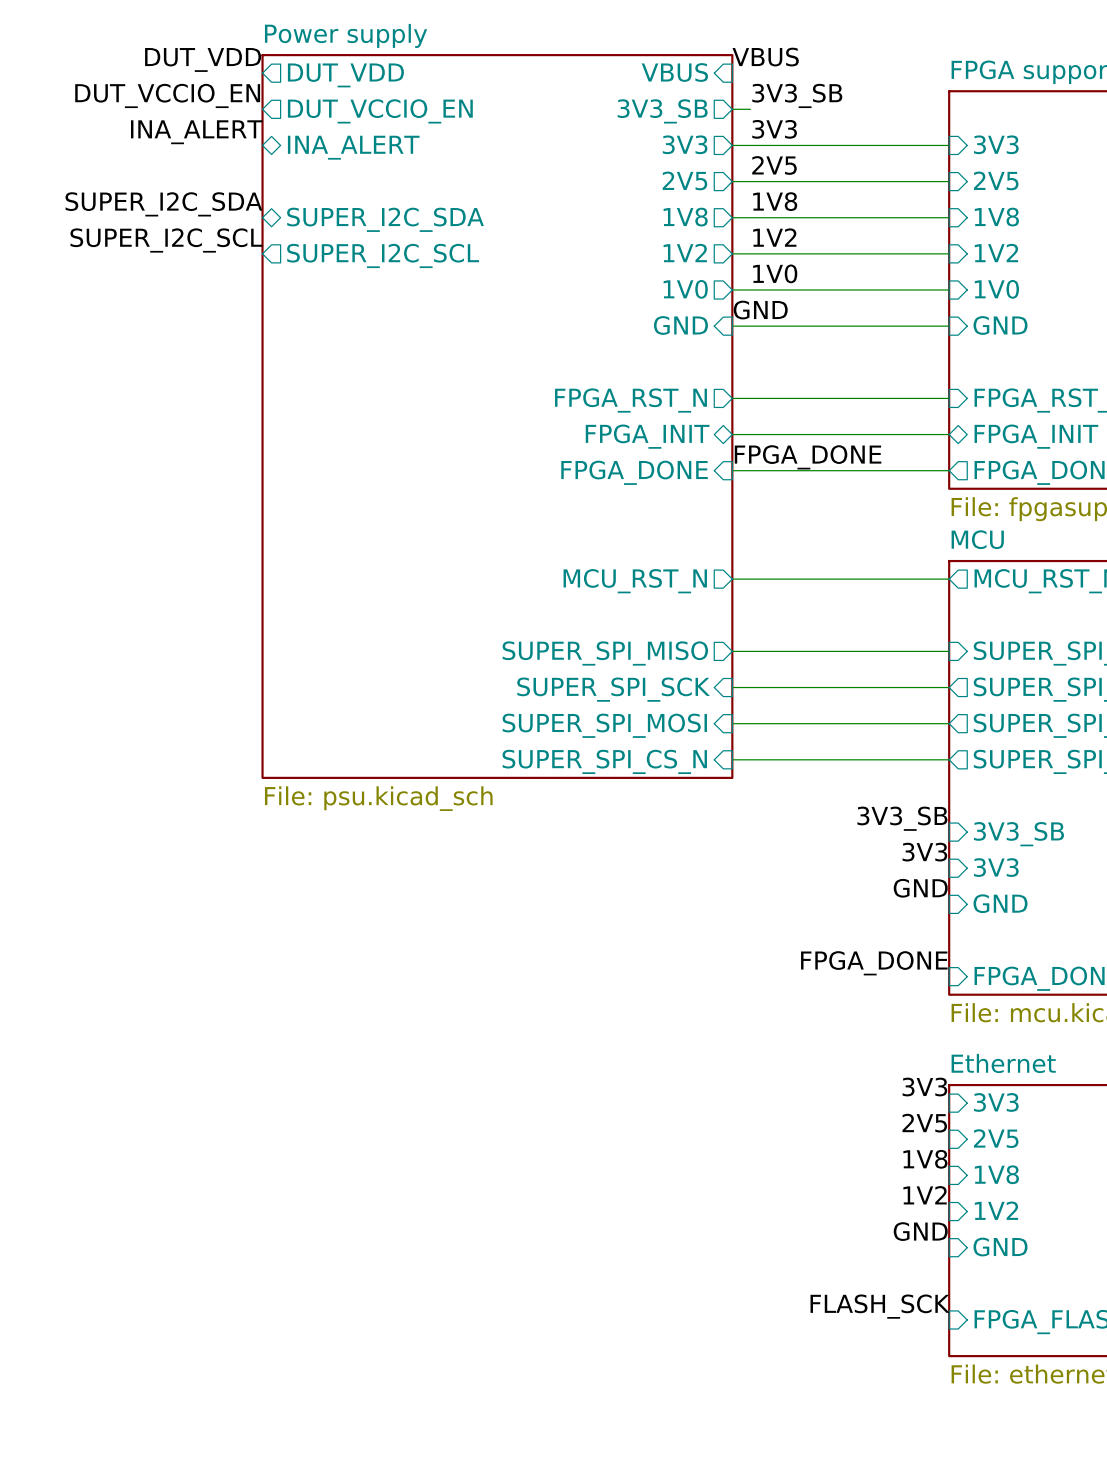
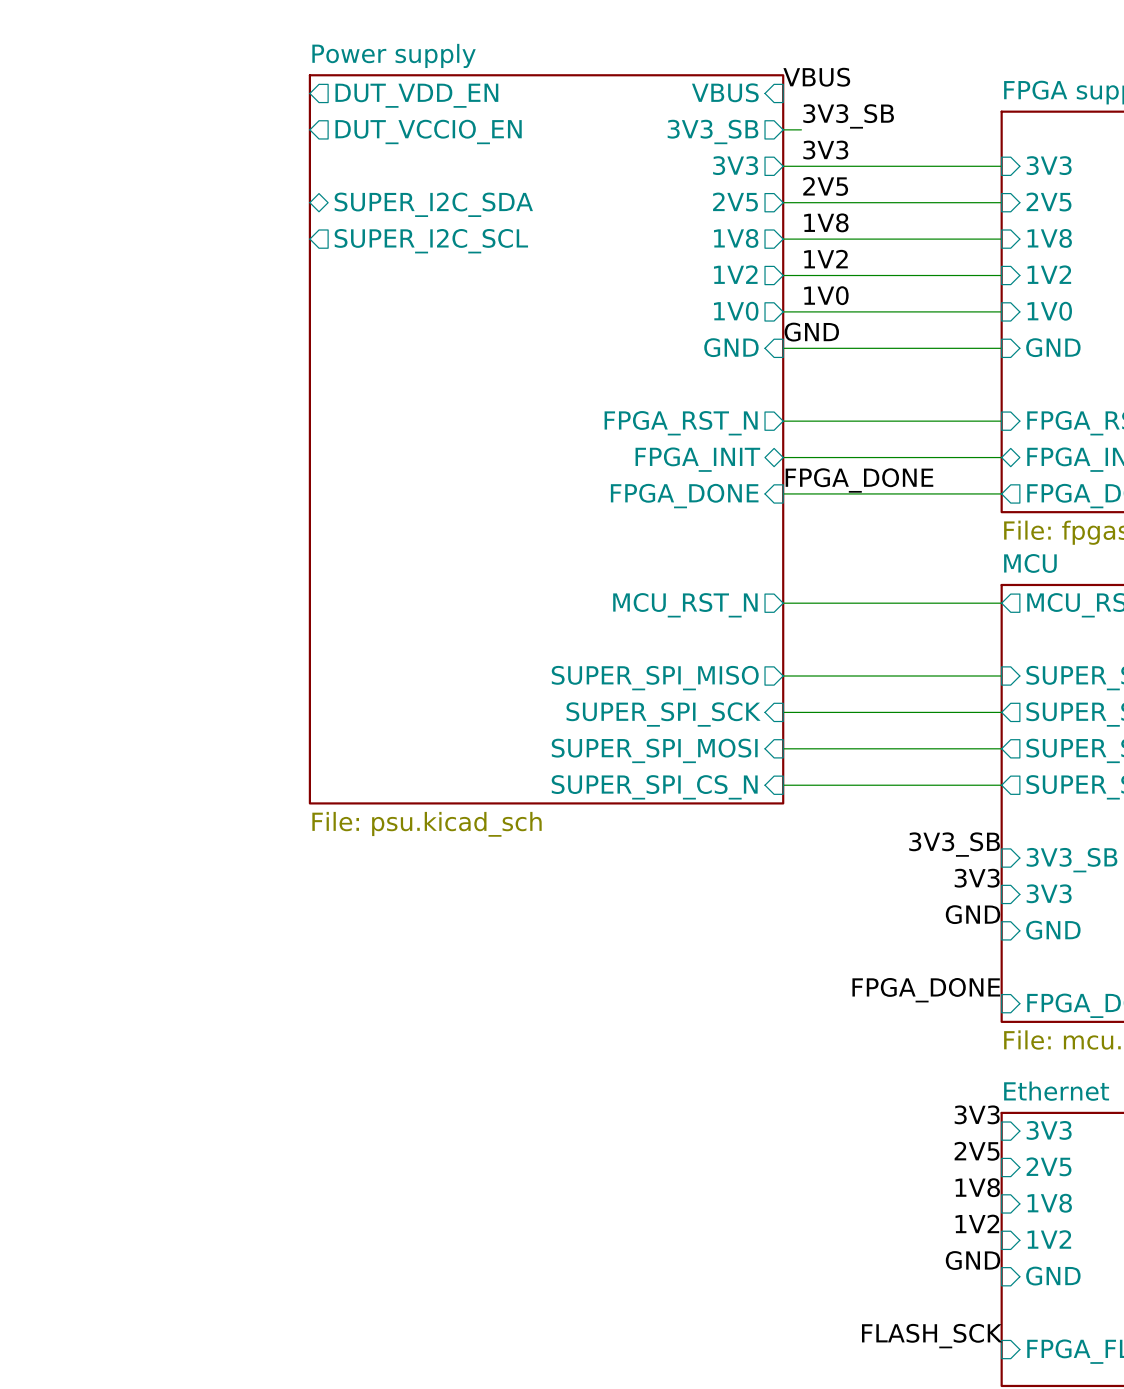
label: DUT_VDD (203, 59) -> none
sheet pin: DUT_VDD (345, 75) -> DUT_VDD_EN (416, 95)
label: DUT_VCCIO_EN (167, 95) -> none
label: INA_ALERT (196, 132) -> none
sheet pin: INA_ALERT (353, 147) -> none
sheet pin: none -> SUPER_I2C_SDA (433, 204)
label: SUPER_I2C_SDA (163, 204) -> none
sheet pin shape: bidirectional (385, 219) -> output (431, 241)
sheet pin: SUPER_I2C_SDA (385, 219) -> SUPER_I2C_SCL (431, 241)
label: SUPER_I2C_SCL (166, 240) -> none
sheet pin: SUPER_I2C_SCL (383, 255) -> none

